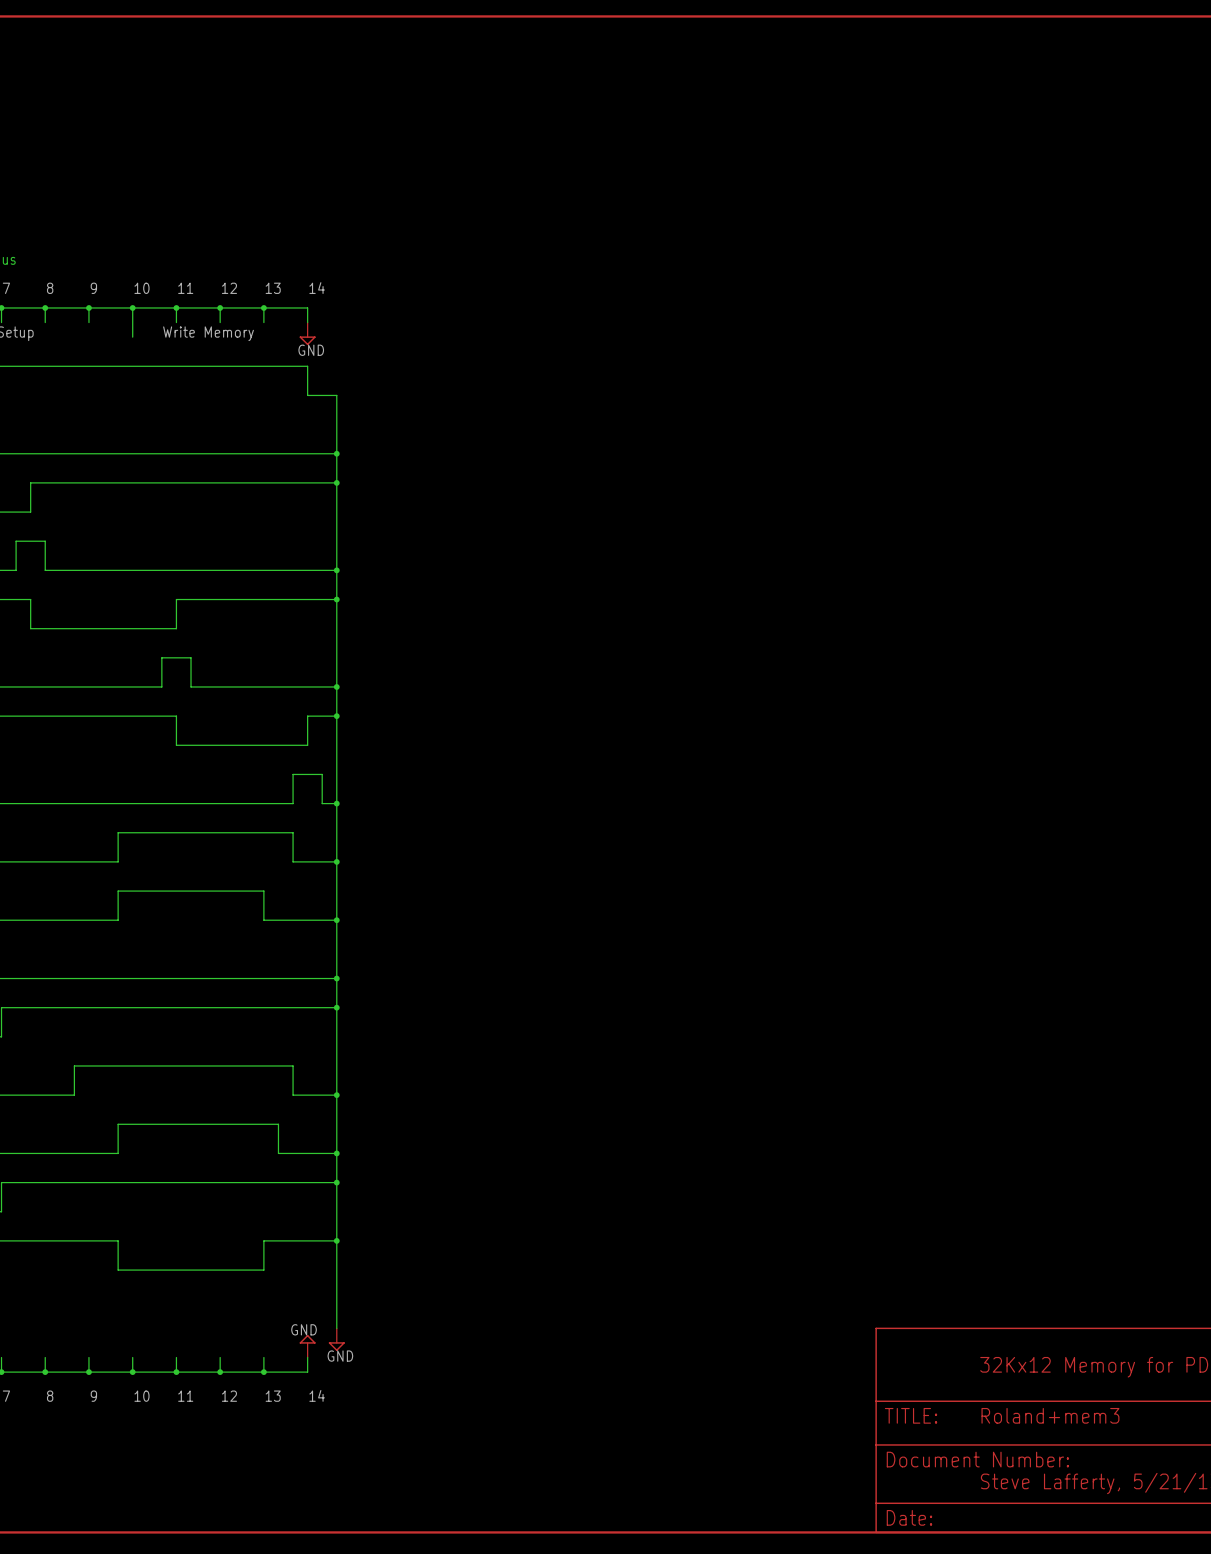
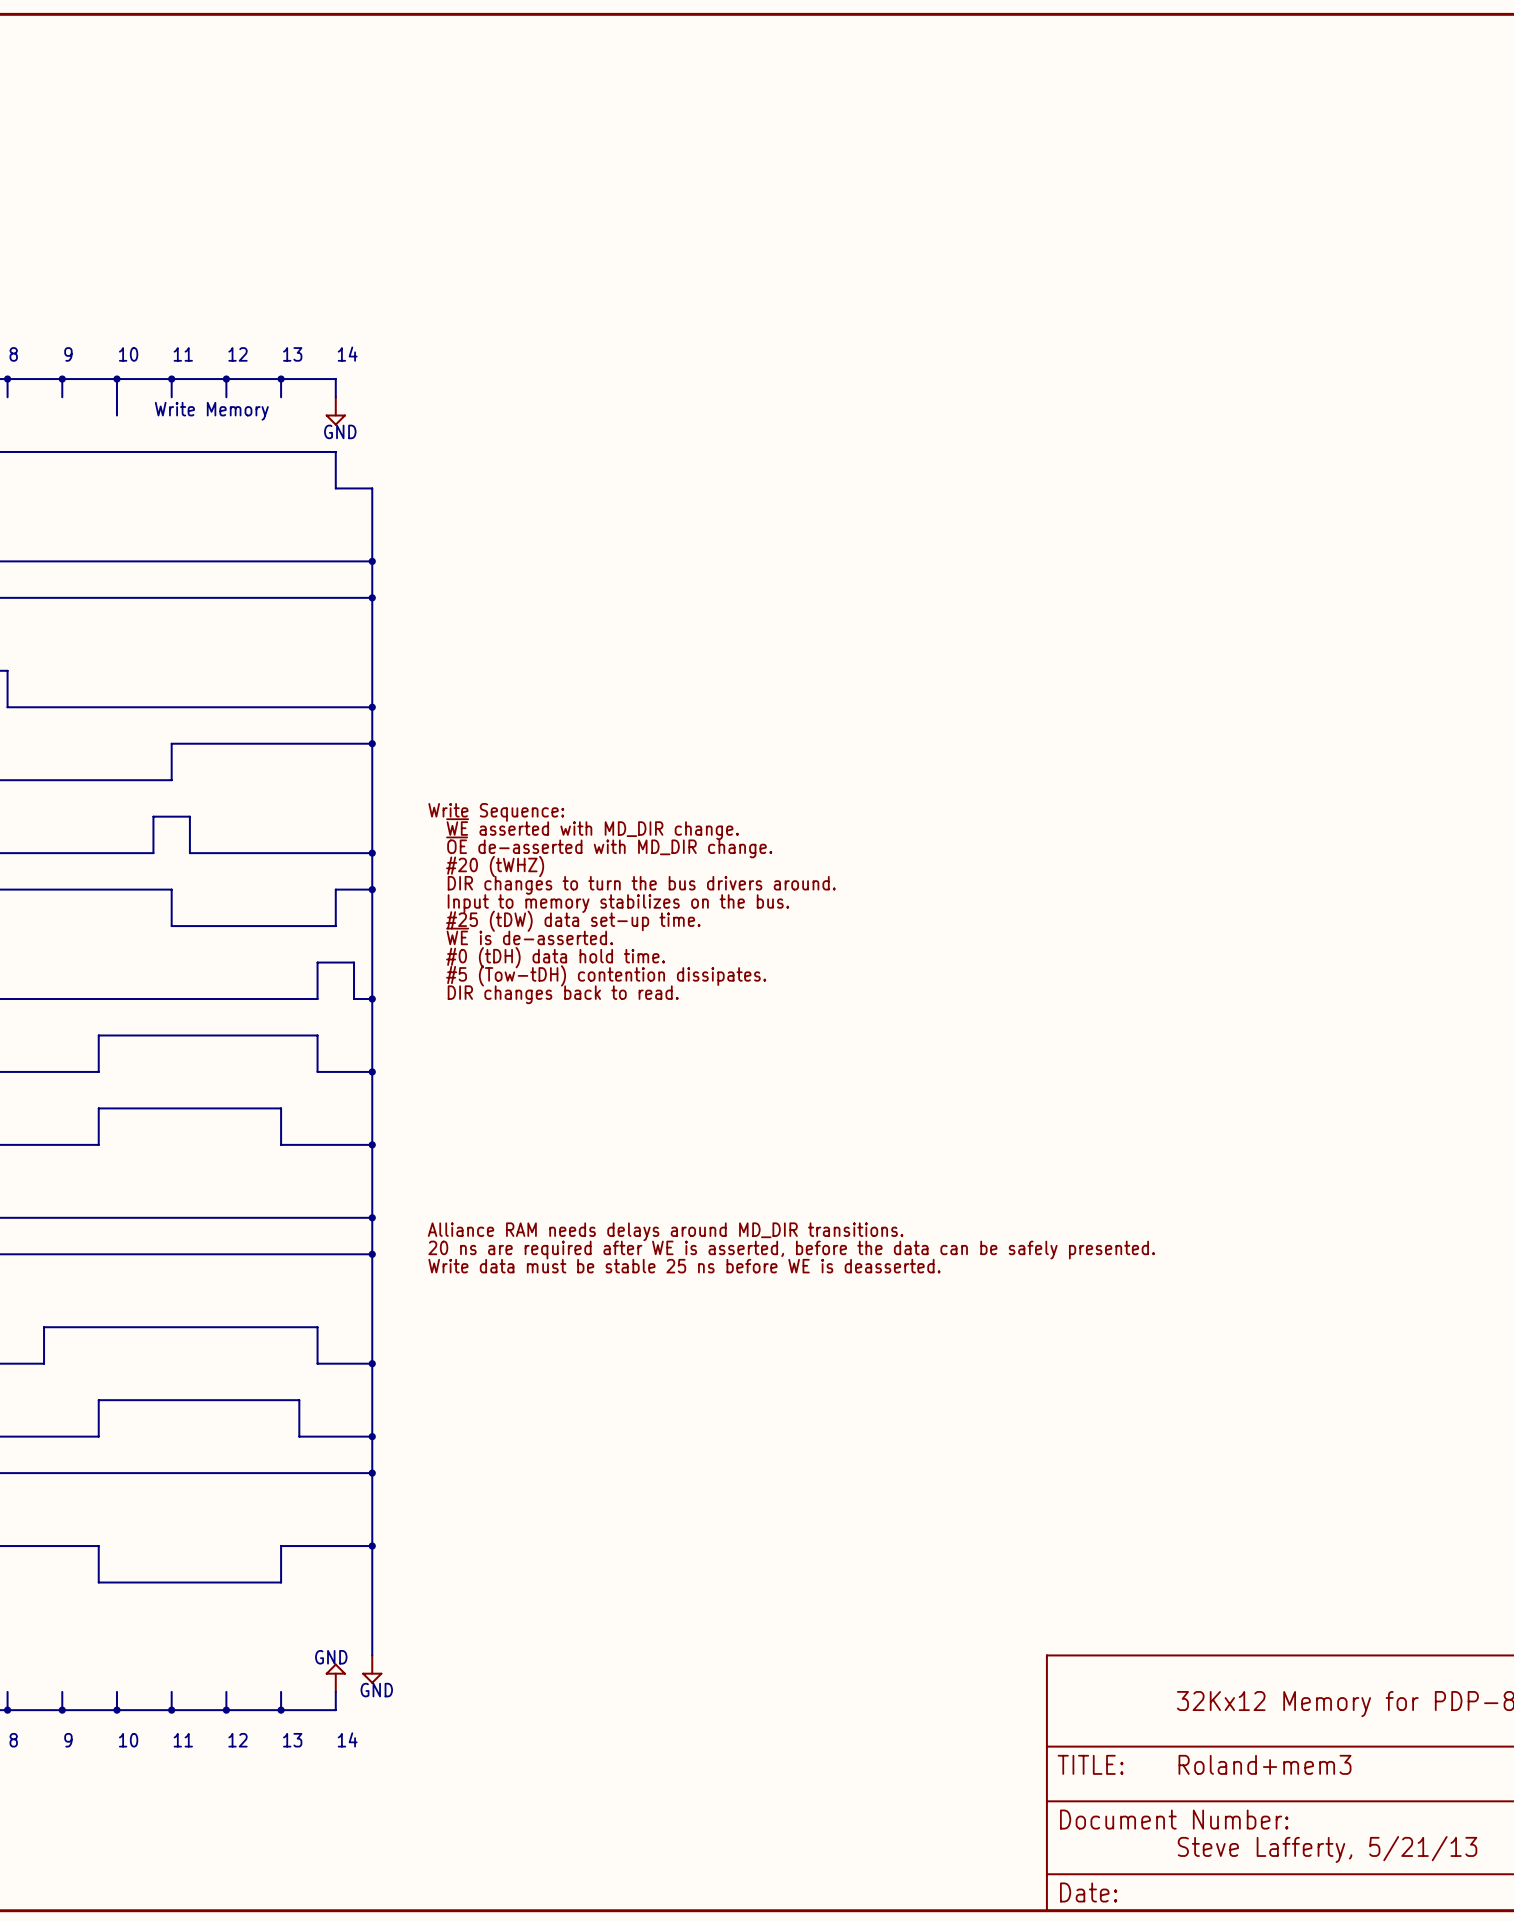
text: none -> Write Sequence: (496, 812)
text: none -> ~{WE} asserted with MD_DIR change. (592, 829)
text: none -> ~{OE} de-asserted with MD_DIR change. (609, 847)
text: none -> #20 (tWHZ) (495, 866)
text: none -> DIR changes to turn the bus drivers around. (641, 885)
text: none -> Input to memory stabilizes on the bus. (618, 903)
text: none -> #25 (tDW) data set-up time. (573, 921)
text: none -> ~{WE} is de-asserted. (529, 936)
text: none -> #0 (tDH) data hold time. (555, 957)
text: none -> #5 (Tow-tDH) contention dissipates. (606, 975)
text: none -> DIR changes back to read. (563, 994)
text: none -> Alliance RAM needs delays around MD_DIR transitions. (665, 1231)
text: none -> 20 ns are required after WE is asserted, before the data can be safely presented. (791, 1250)
text: none -> Write data must be stable 25 ns before WE is deasserted. (684, 1266)

